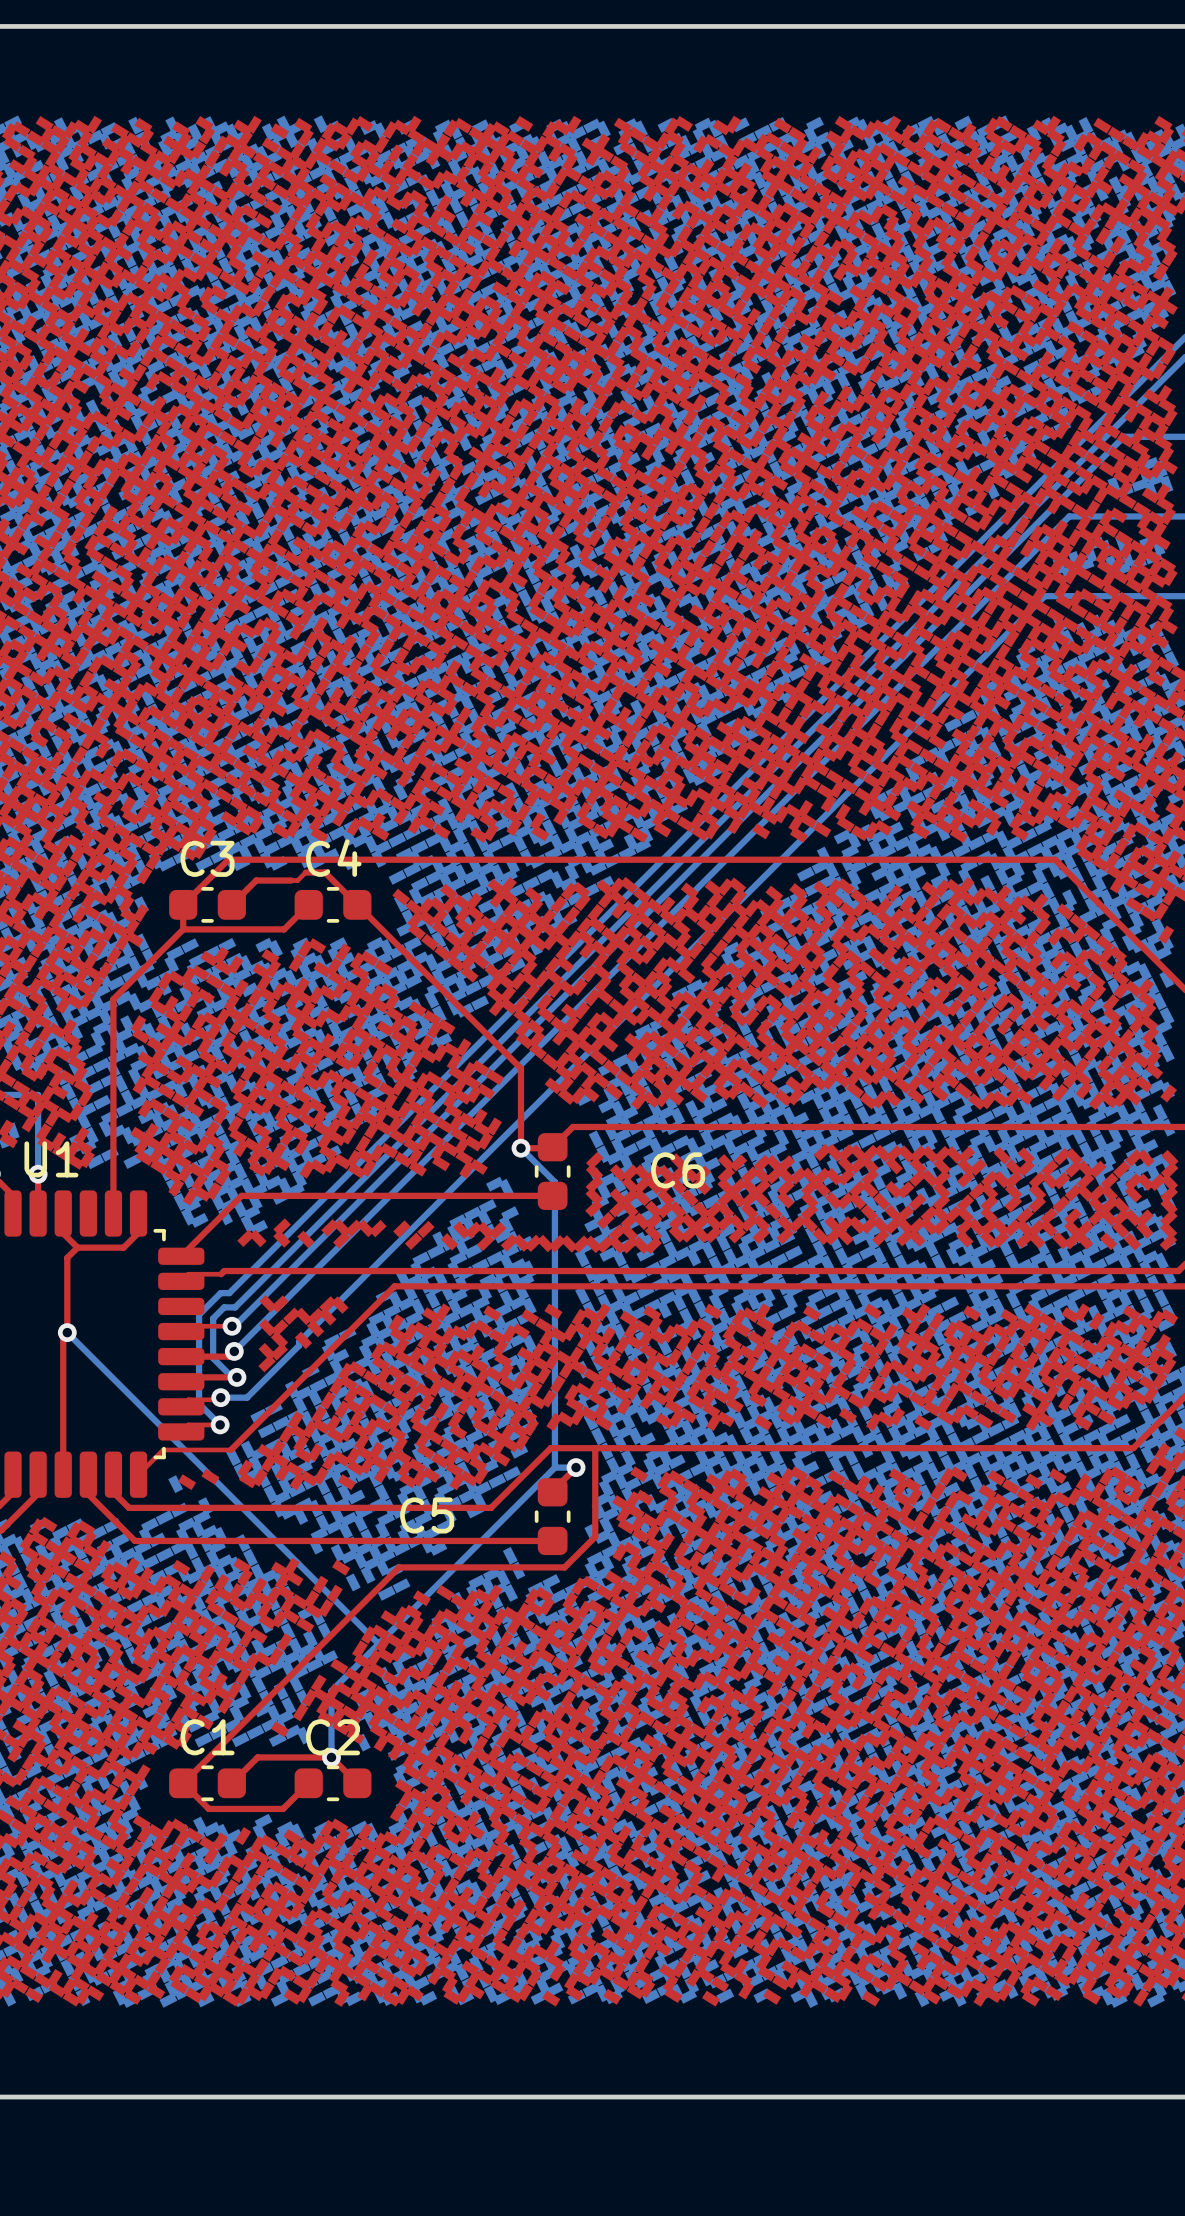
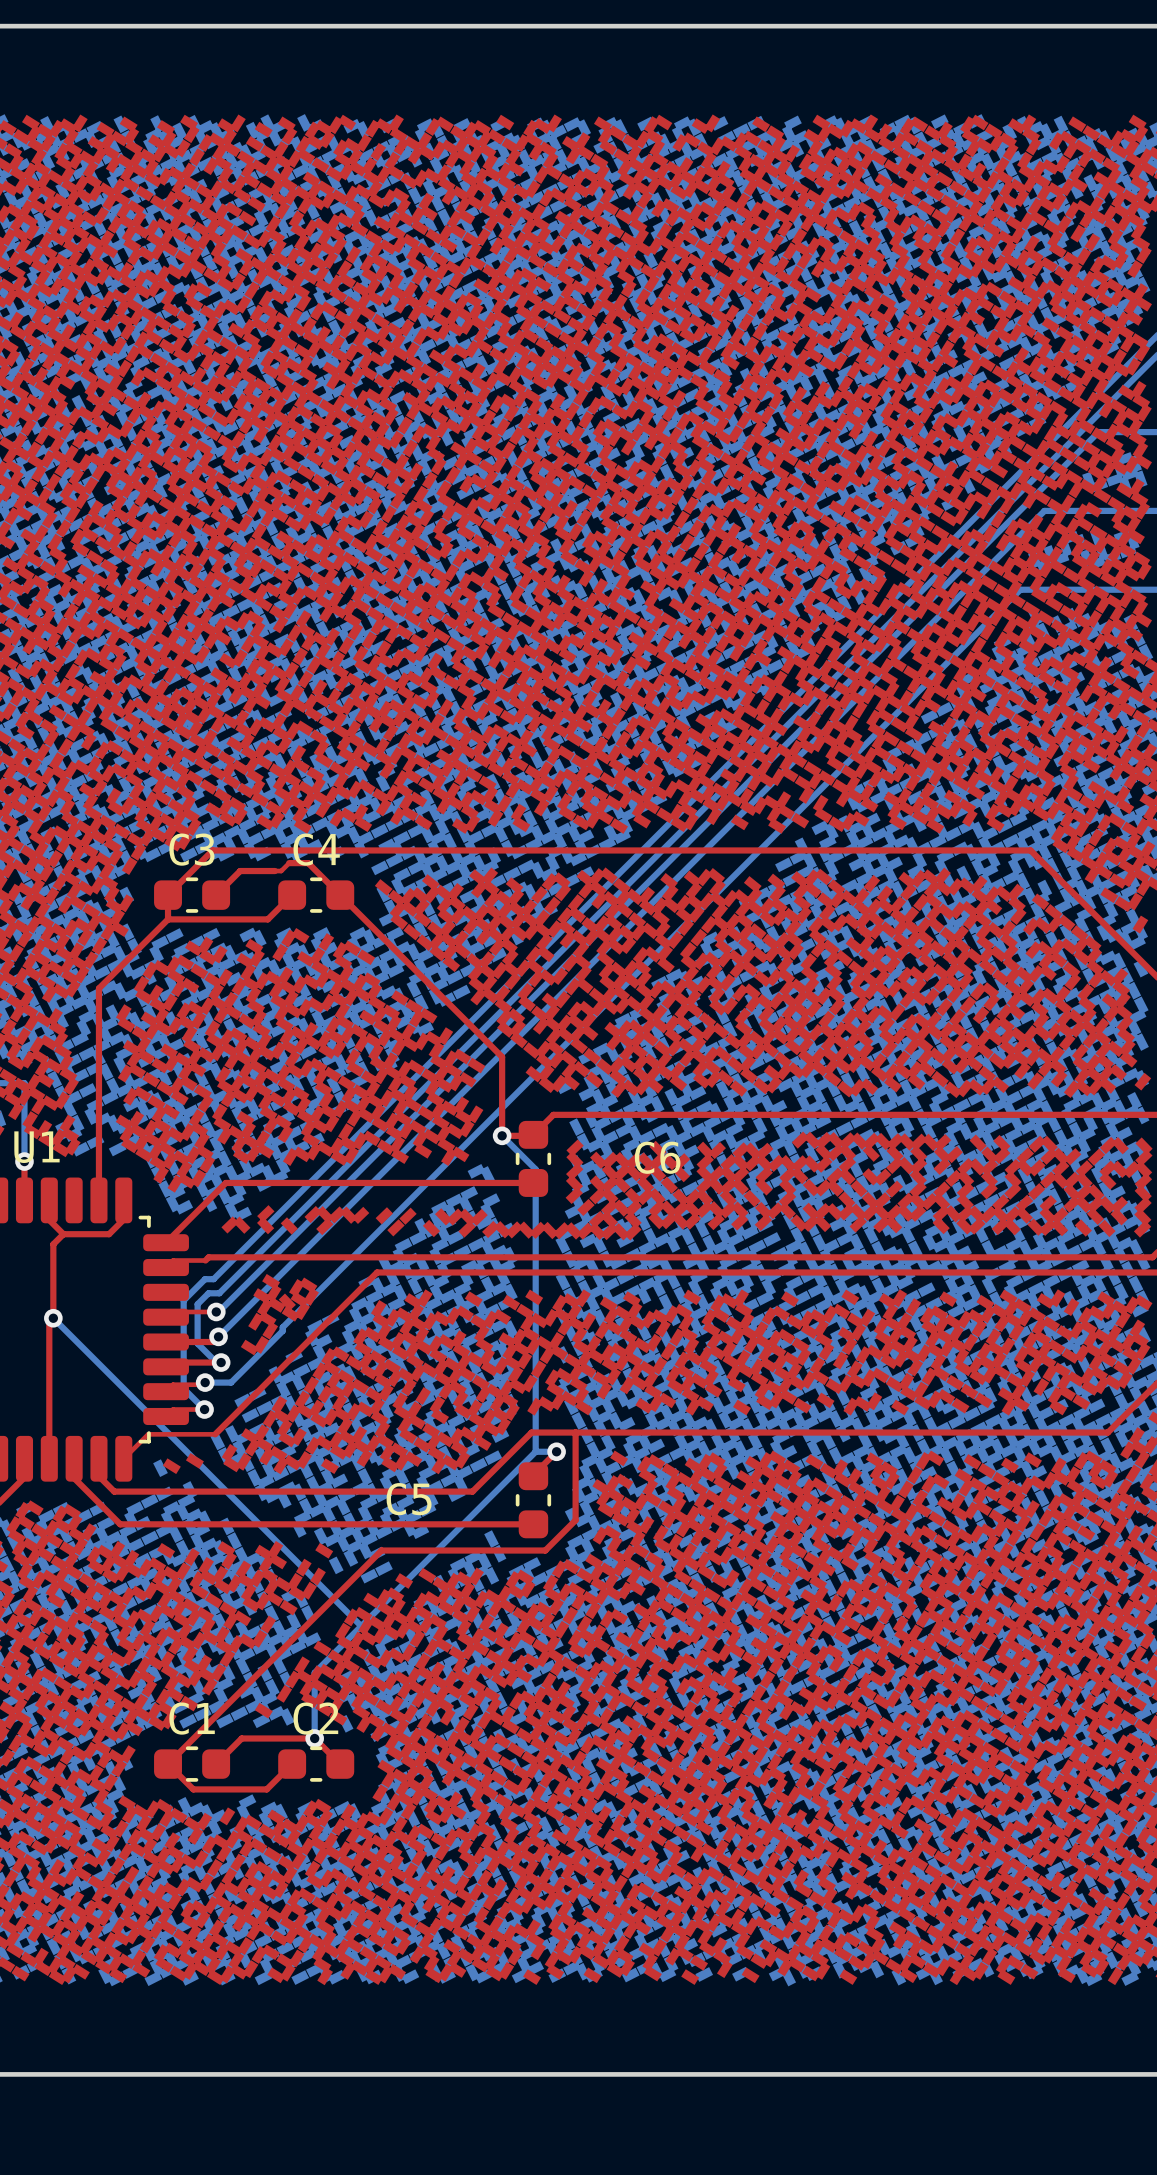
drawing: none -> [248, 1273, 319, 1354]
drawing: [258, 1295, 349, 1361] -> none
drawing shape: [283, 1307, 301, 1325] -> [267, 1297, 286, 1313]
drawing shape: [307, 1307, 325, 1326] -> [290, 1291, 309, 1308]
drawing shape: [258, 1354, 276, 1373] -> [240, 1339, 259, 1356]

